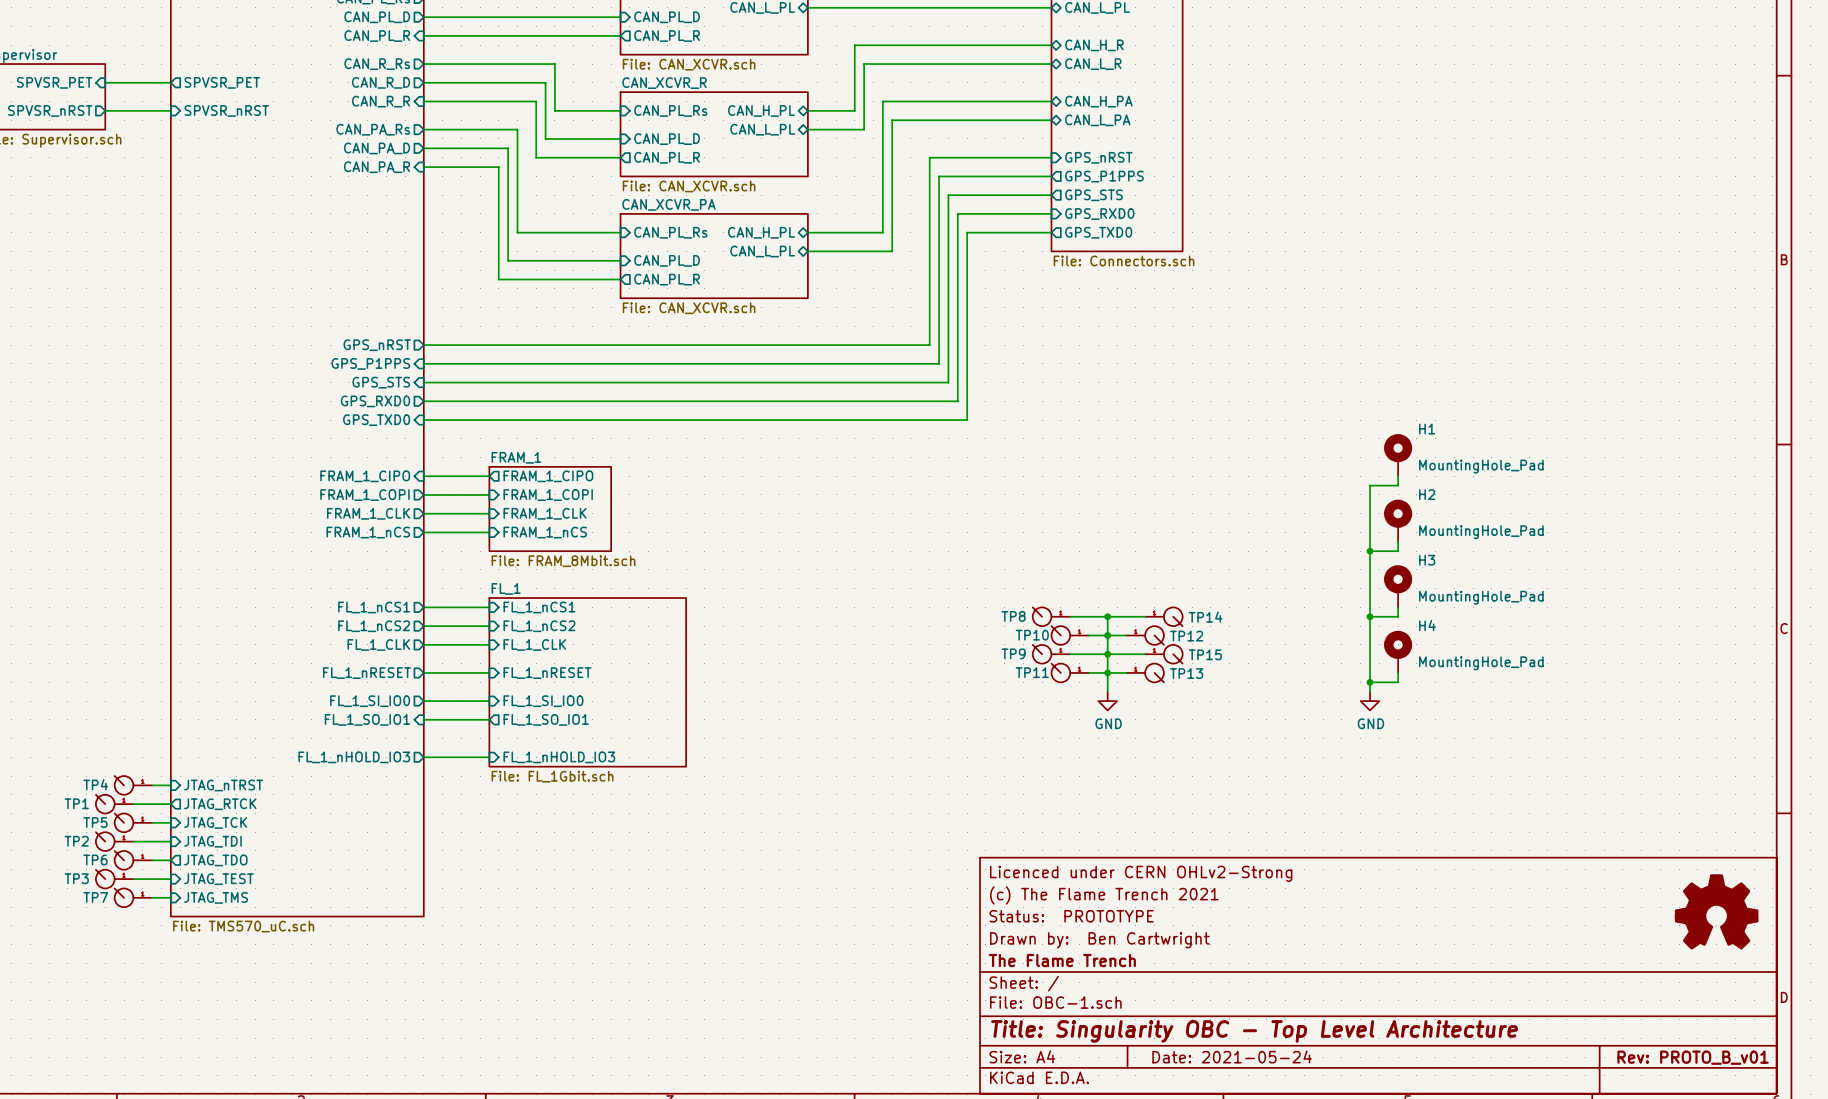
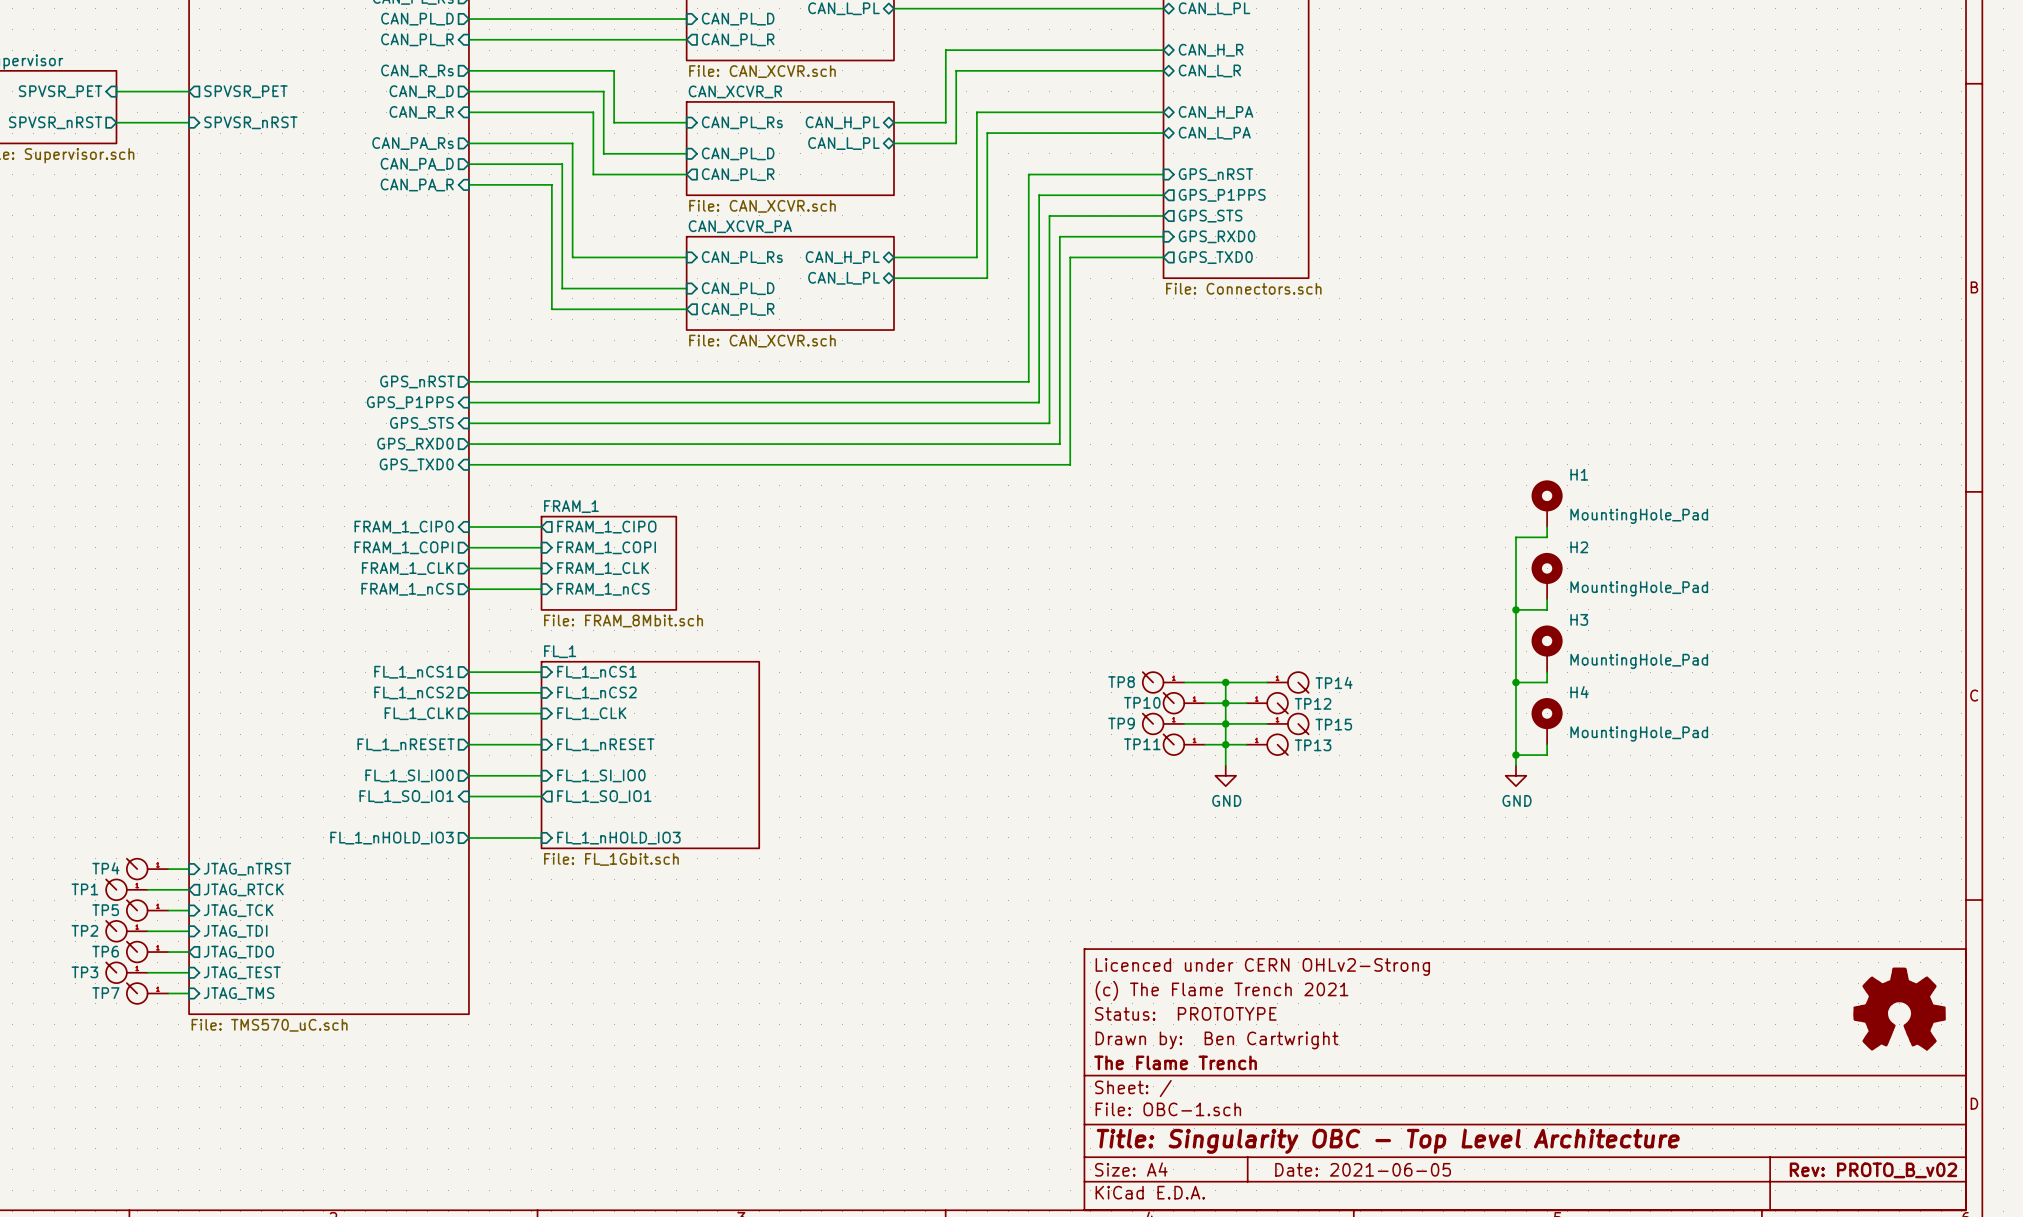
title block: Date: 2021-05-24 (1232, 1056) -> Date: 2021-06-05 (1363, 1169)
title block: Rev: PROTO_B_v01 (1693, 1057) -> Rev: PROTO_B_v02 (1873, 1170)

